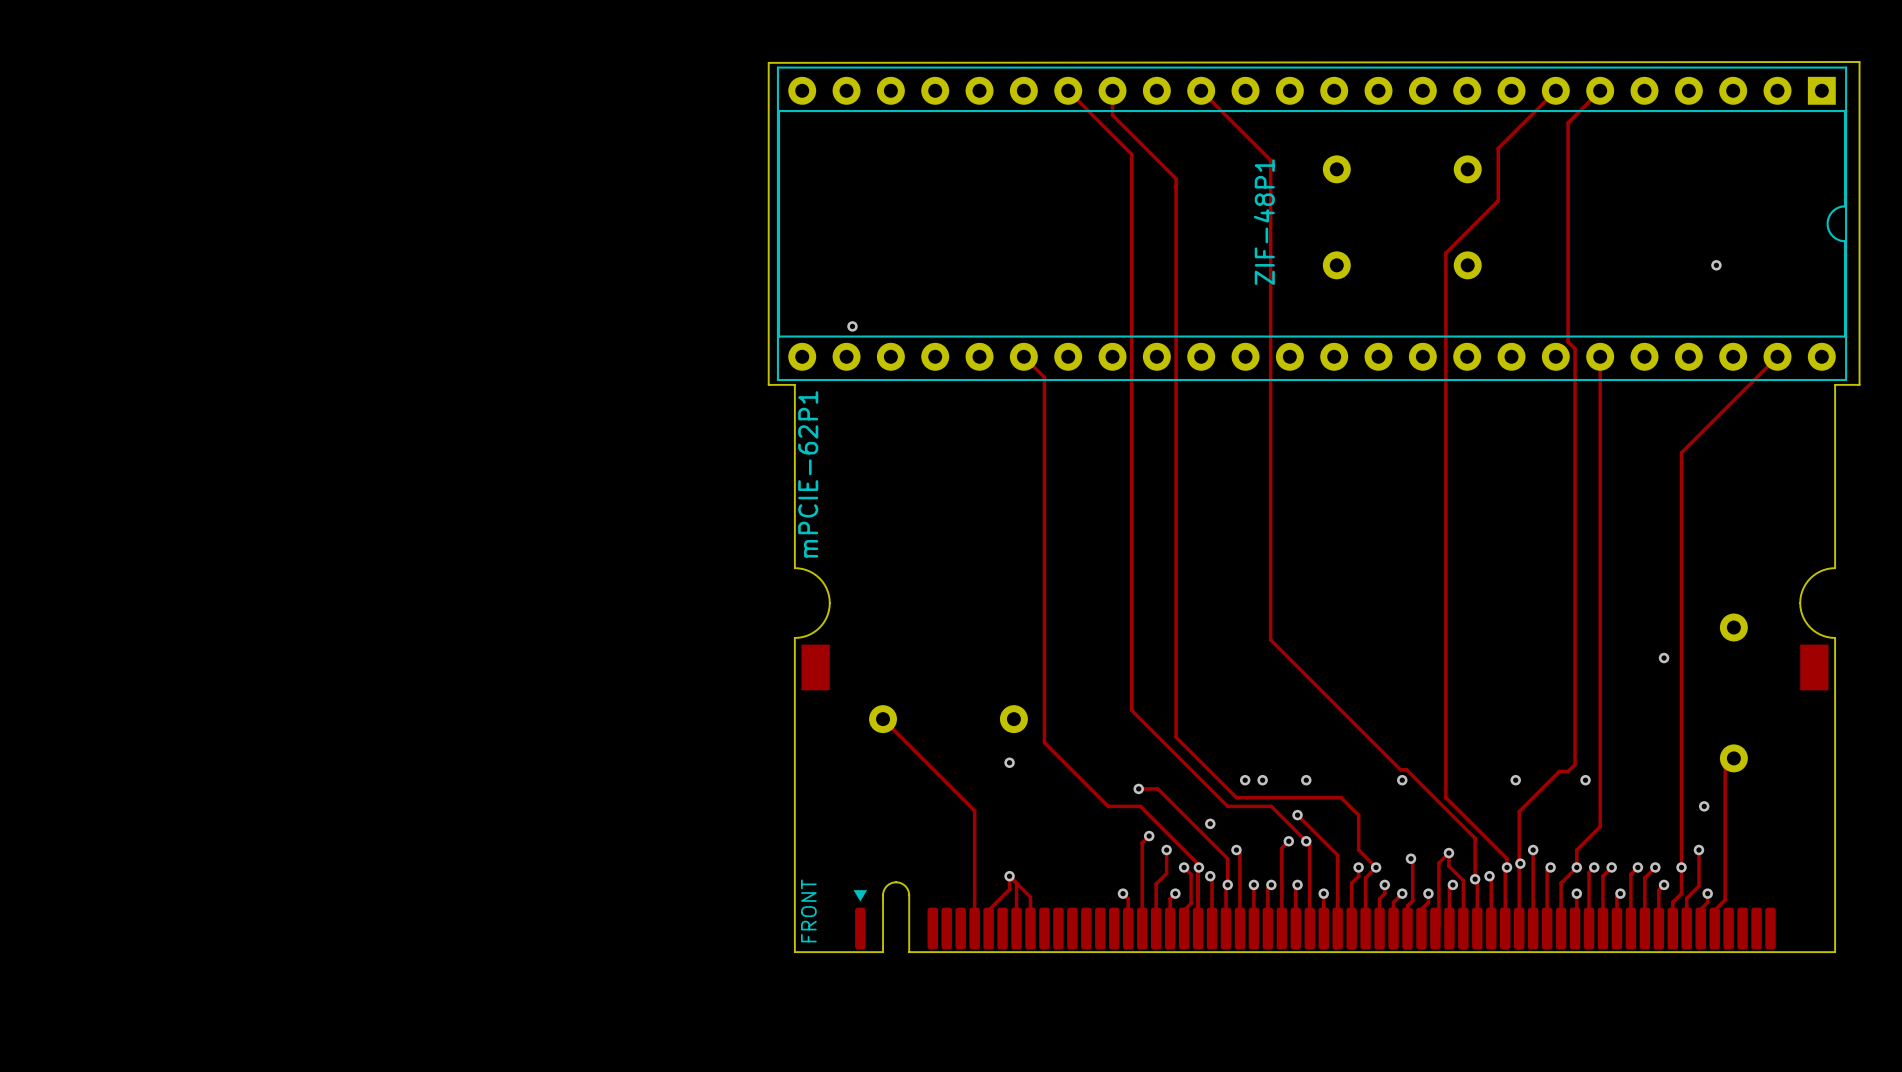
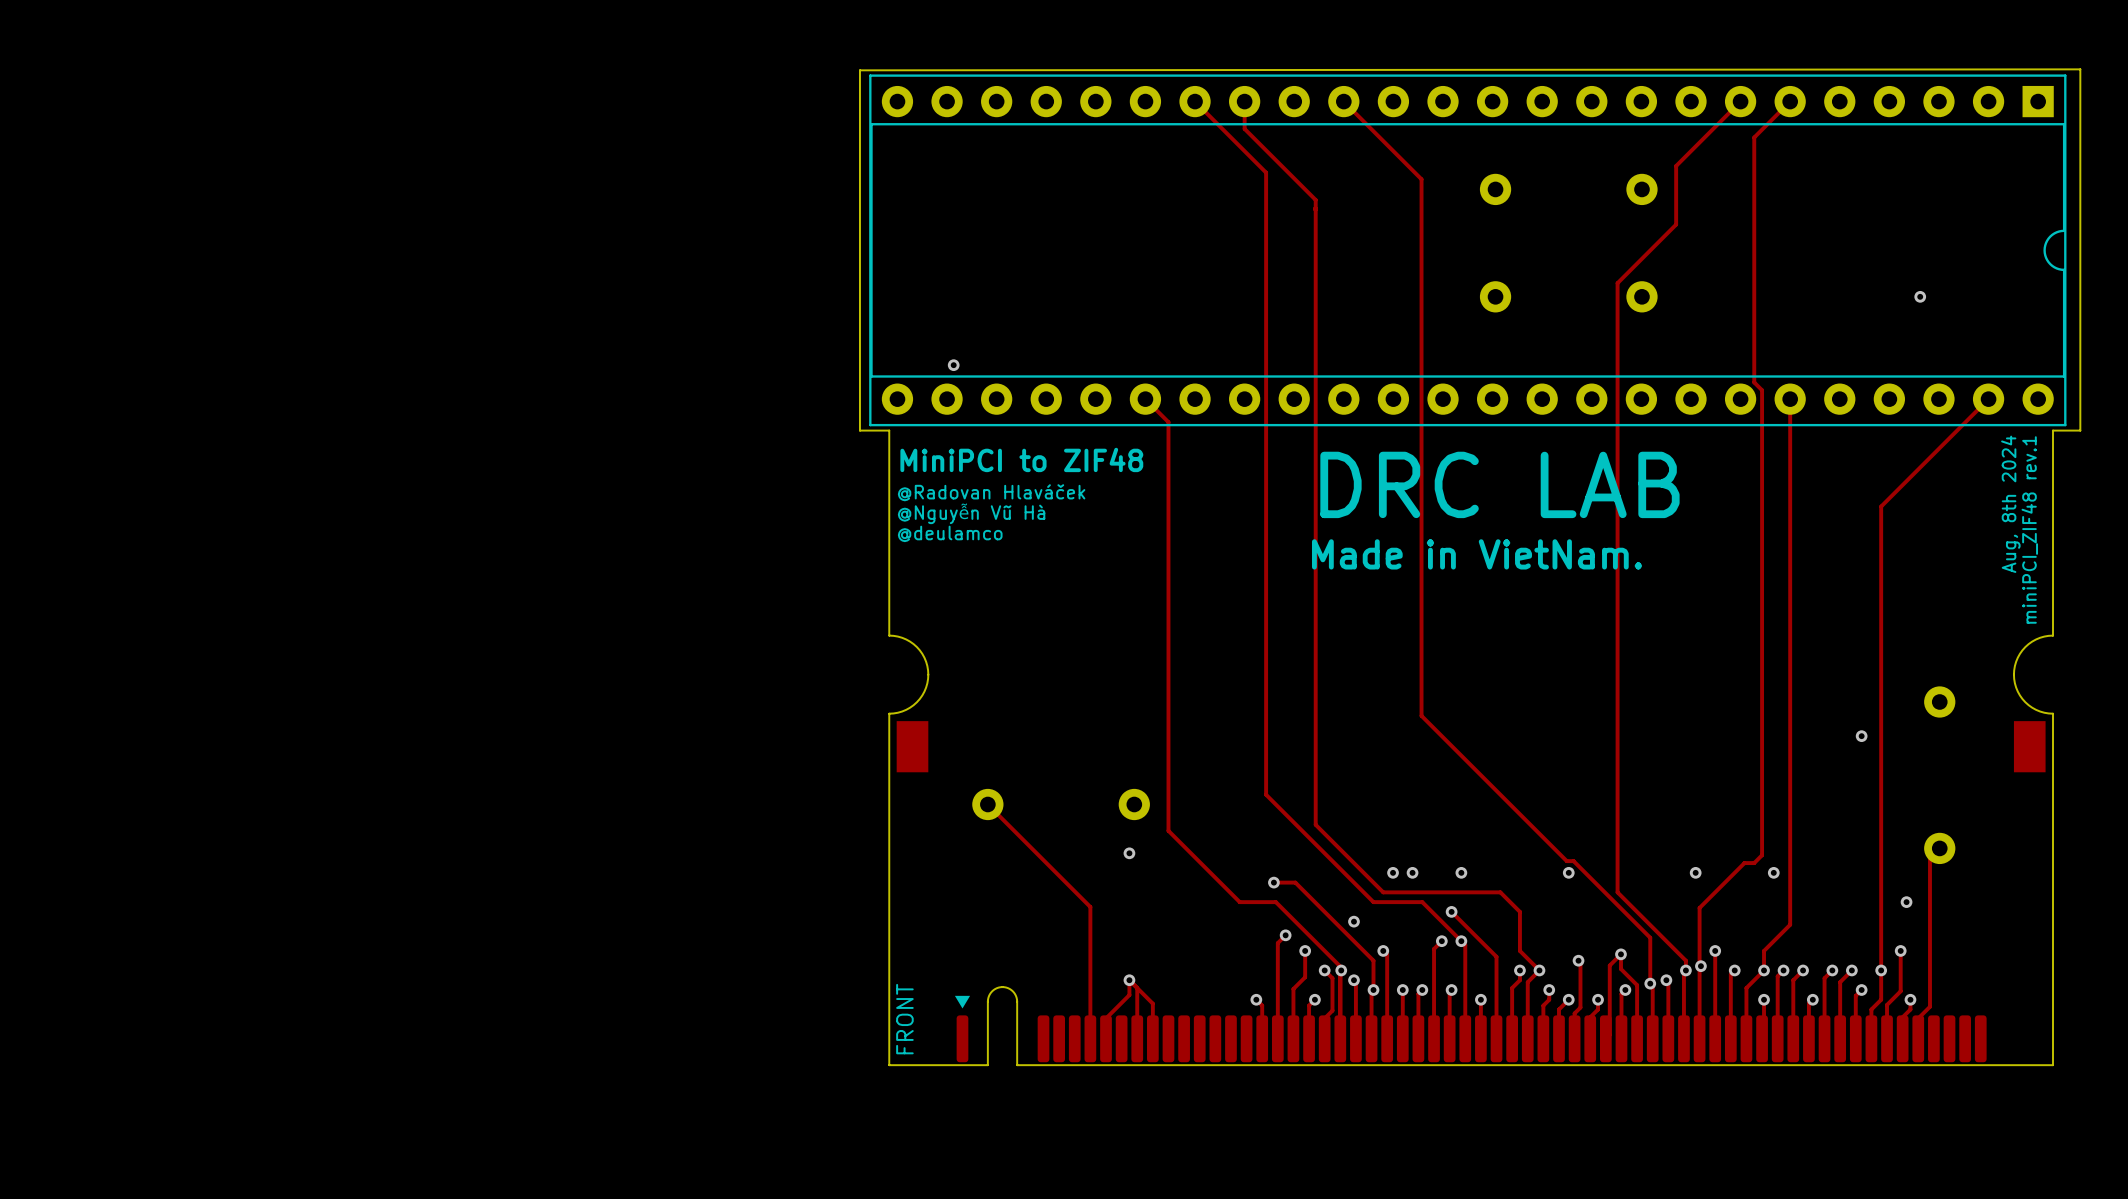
ZIF-48P1 name: ZIF-48P1 (1264, 222) -> none
text: none -> MiniPCI to ZIF48 (1021, 459)
text: none -> DRC LAB (1499, 484)
text: none -> @Radovan Hlaváček (991, 492)
text: none -> Aug, 8th 2024 (2010, 504)
text: none -> @Nguyễn Vũ Hà (971, 513)
text: none -> miniPCI_ZIF48 rev.1 (2029, 529)
mPCIE-62P1 name: mPCIE-62P1 (808, 474) -> none
text: none -> @deulamco (950, 533)
text: none -> Made in VietNam. (1476, 554)

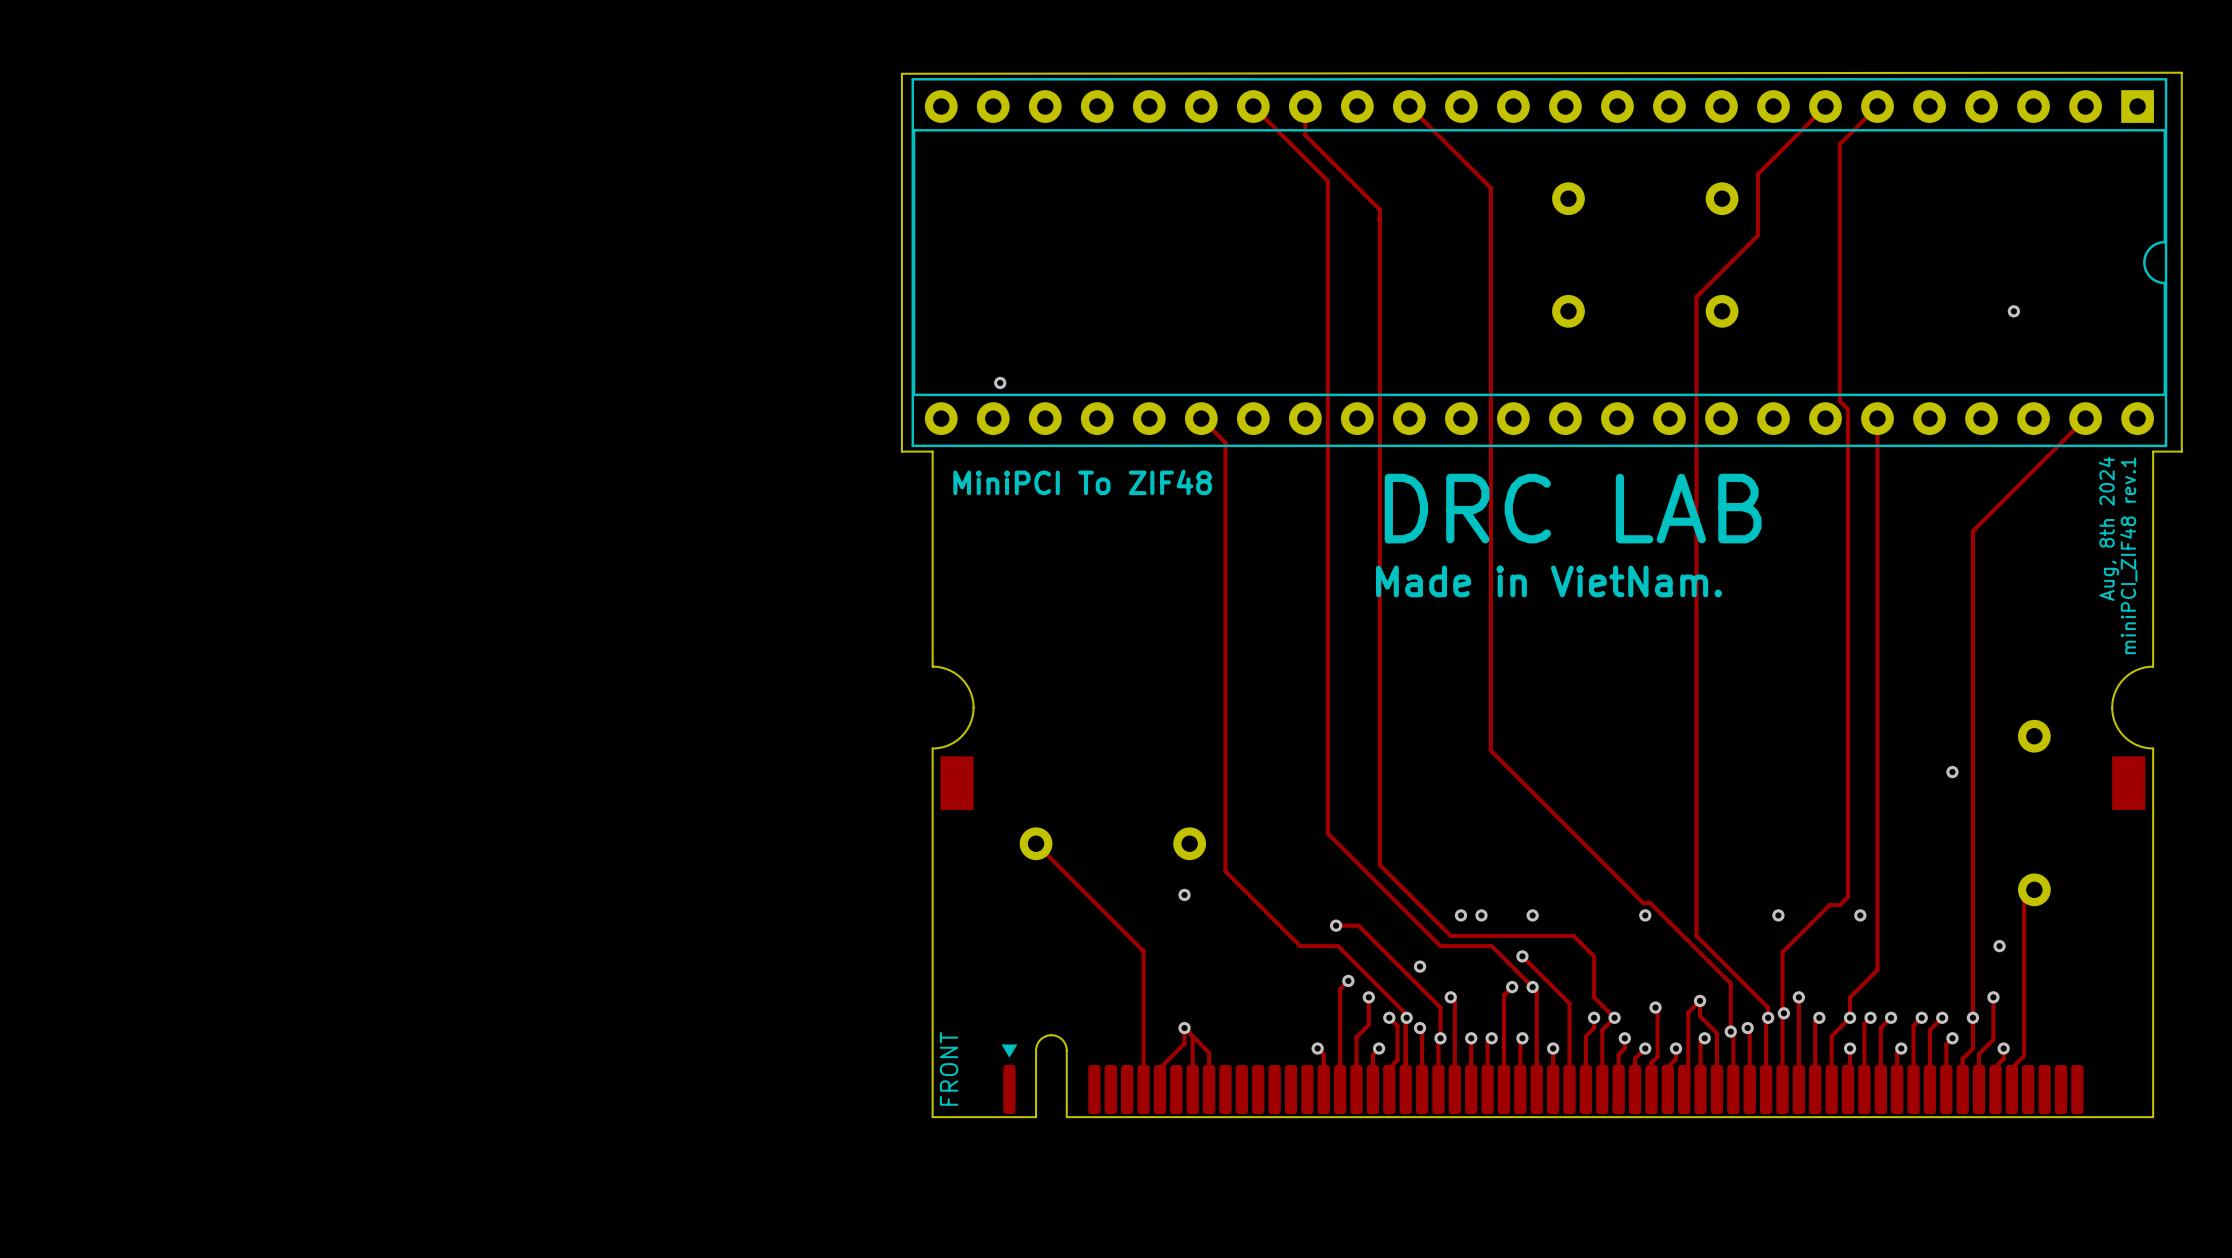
text: MiniPCI to ZIF48 (1021, 459) -> MiniPCI To ZIF48 (1082, 482)
text: @Radovan Hlaváček (991, 492) -> none
text: @Nguyễn Vũ Hà (971, 513) -> none
text: @deulamco (950, 533) -> none

